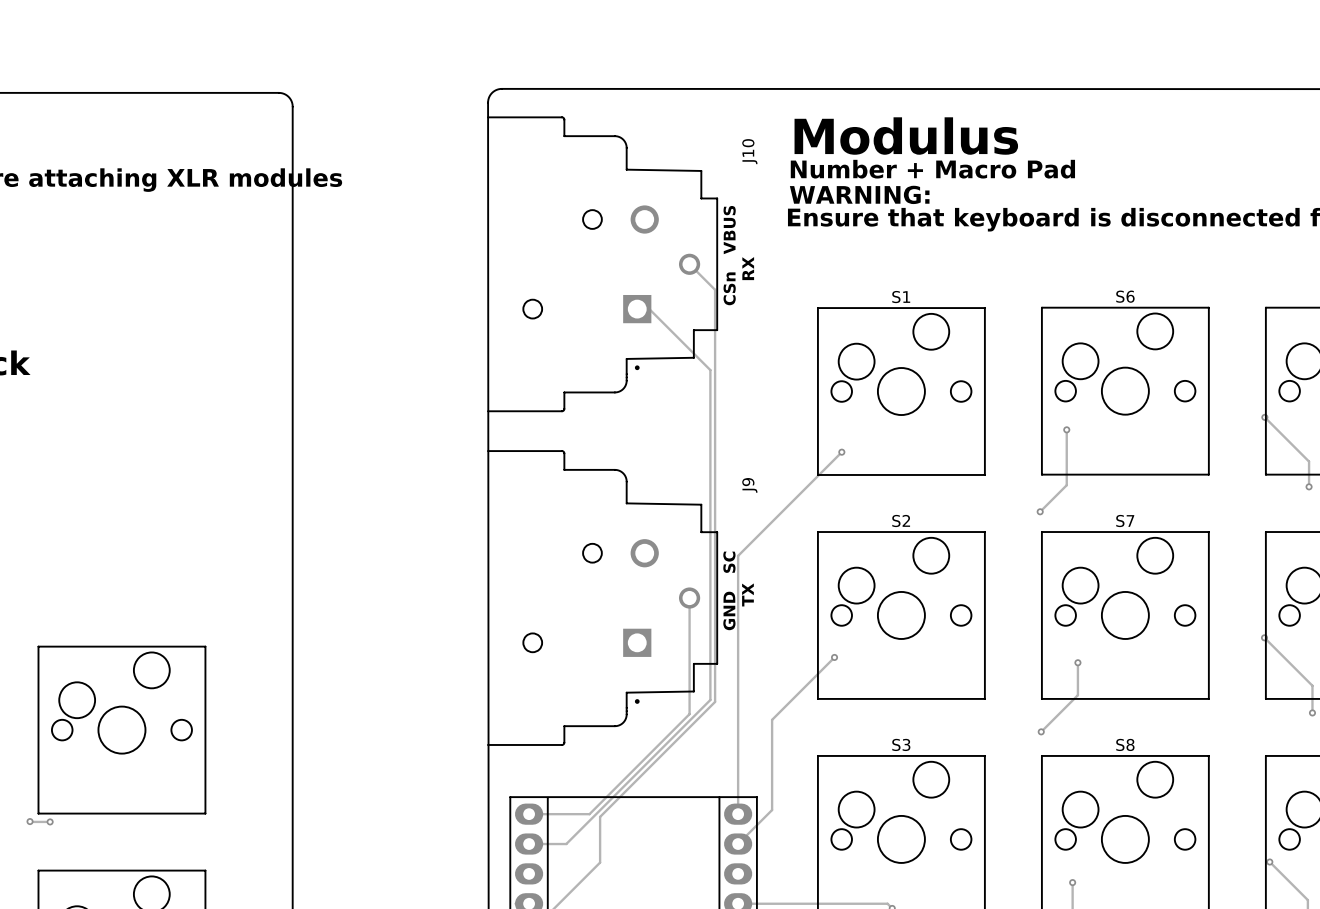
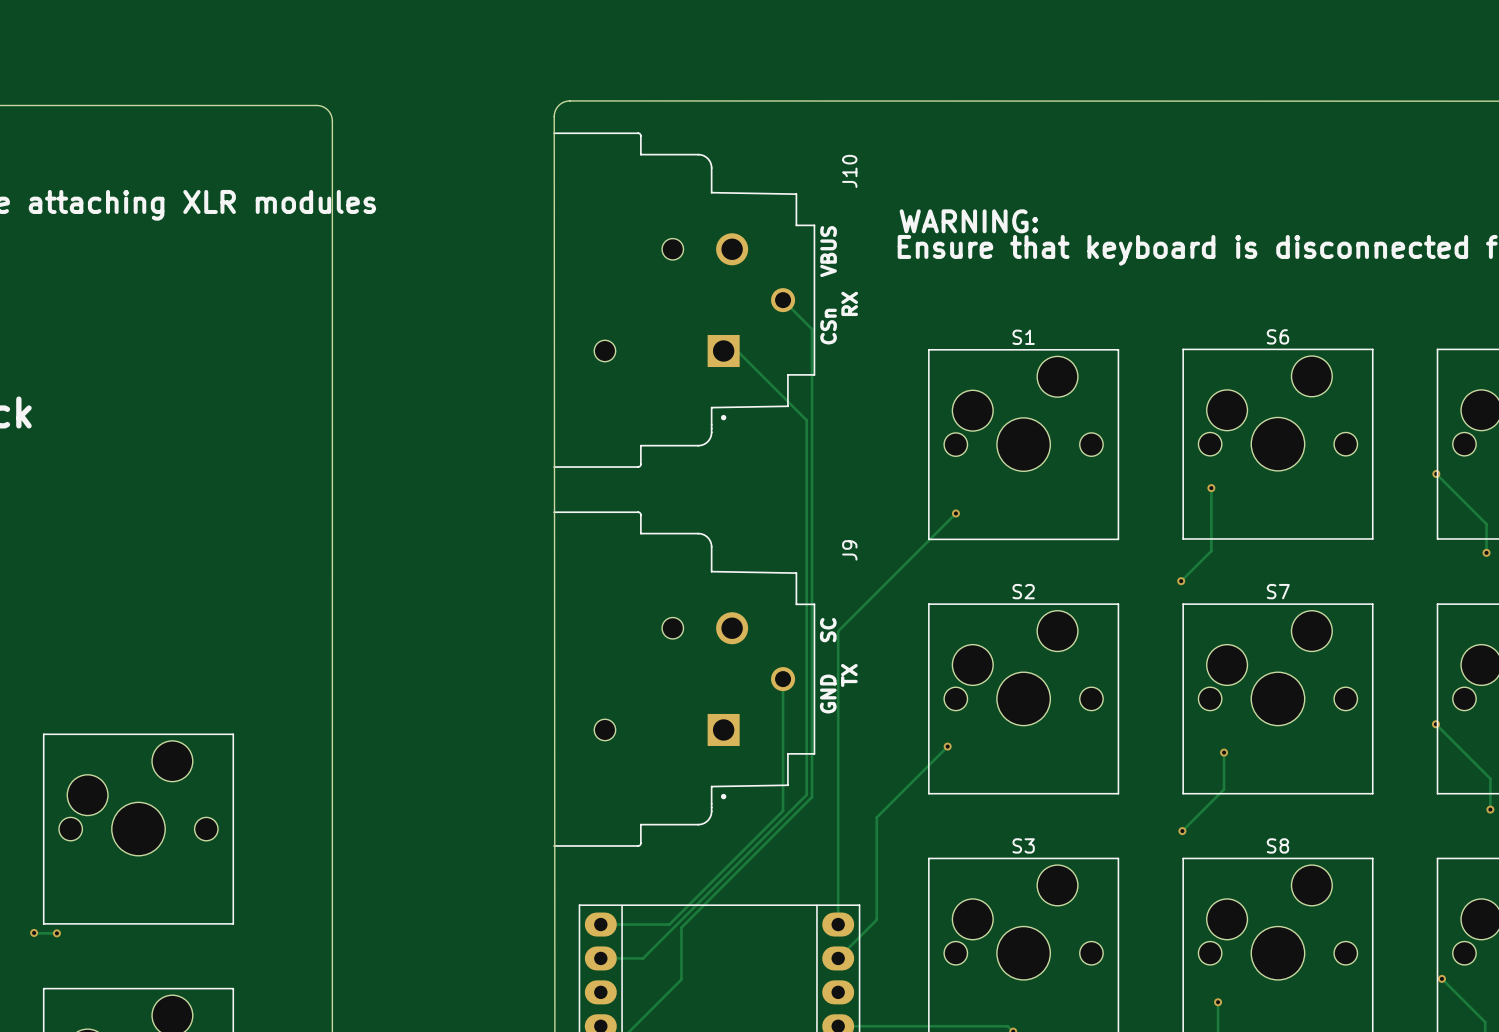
text: Modulus (906, 136) -> none
text: Number + Macro Pad (932, 169) -> none

